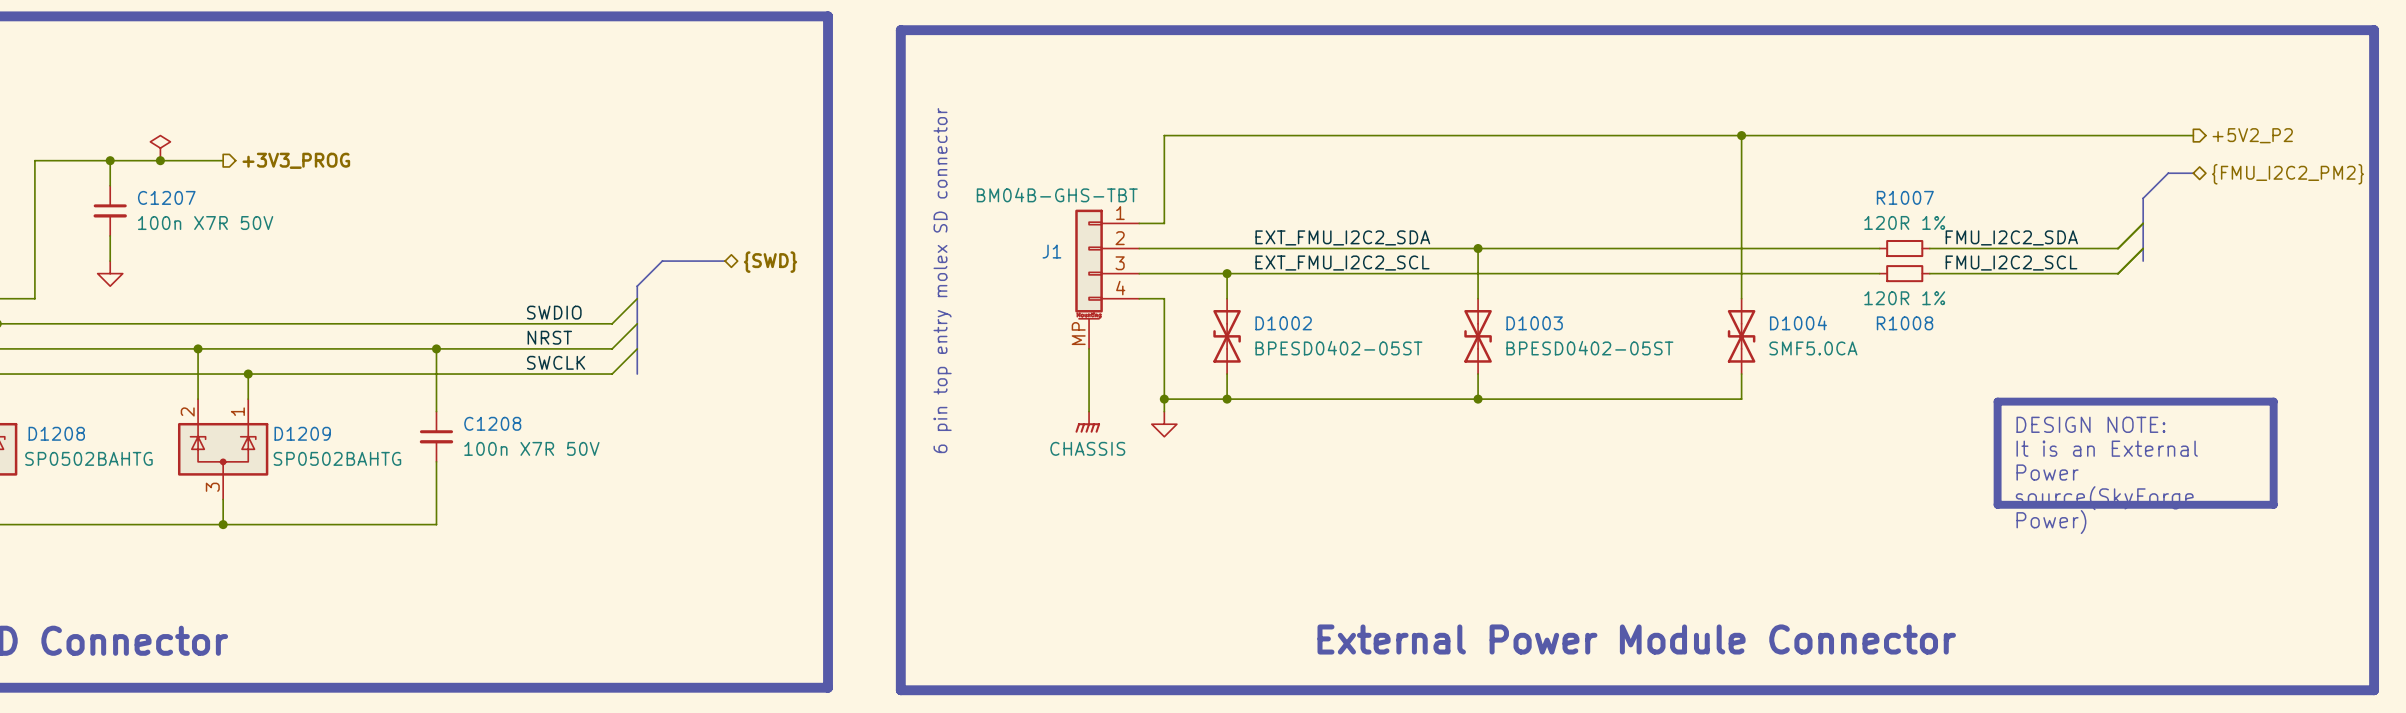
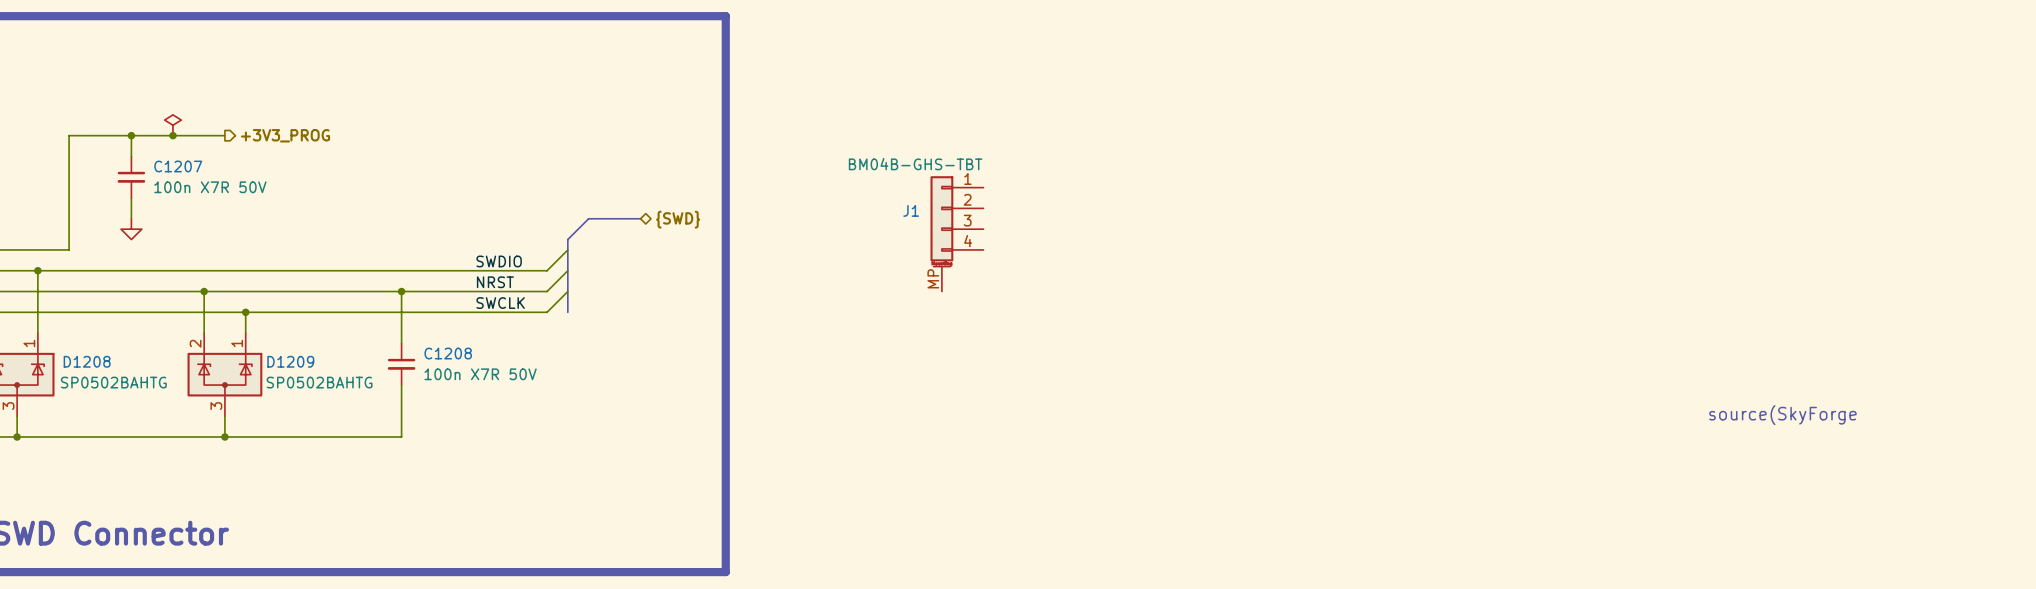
line: (900, 30) (2374, 30) (2374, 690) (900, 690) (900, 30) -> none
wire: (1741, 135) (1741, 298) -> none
junction: (1741, 135) -> none
wire: (2193, 135) (1164, 135) (1164, 223) (1139, 223) -> none
hierarchical label: +5V2_P2 (2252, 135) -> none
bus: (2193, 173) (2168, 173) (2143, 198) (2143, 261) -> none
hierarchical label: {FMU_I2C2_PM2} (2287, 174) -> none
wire: (2143, 223) (2118, 248) (1929, 248) -> none
label: EXT_FMU_I2C2_SDA (1342, 237) -> none
label: FMU_I2C2_SDA (2011, 237) -> none
wire: (1139, 248) (1879, 248) -> none
wire: (1478, 248) (1478, 298) -> none
junction: (1478, 248) -> none
R1007: 120R 1% (1904, 248) -> none
wire: (2143, 248) (2118, 273) (1929, 273) -> none
label: EXT_FMU_I2C2_SCL (1342, 263) -> none
label: FMU_I2C2_SCL (2011, 263) -> none
wire: (1139, 273) (1879, 273) -> none
wire: (1227, 273) (1227, 298) -> none
junction: (1227, 273) -> none
R1008: 120R 1% (1904, 273) -> none
text: 6 pin top entry molex SD connector (942, 280) -> none
wire: (1139, 298) (1164, 298) (1164, 411) -> none
D1002: BPESD0402-05ST (1227, 336) -> none
D1003: BPESD0402-05ST (1478, 336) -> none
D1004: SMF5.0CA (1741, 336) -> none
wire: (1089, 348) (1089, 411) -> none
wire: (1227, 374) (1227, 399) -> none
wire: (1478, 374) (1478, 399) -> none
wire: (1741, 374) (1741, 399) (1164, 399) -> none
junction: (1164, 399) -> none
junction: (1227, 399) -> none
junction: (1478, 399) -> none
line: (1997, 401) (2273, 401) (2273, 504) (1997, 504) (1997, 401) -> none
power symbol: CHASSIS (1087, 422) -> none
power symbol: (1164, 424) -> none
text: DESIGN NOTE: (2090, 424) -> none
text: It is an External (2107, 448) -> none
text: Power (2047, 472) -> none
text: Power) (2051, 522) -> none
text: External Power Module Connector (1636, 639) -> none

